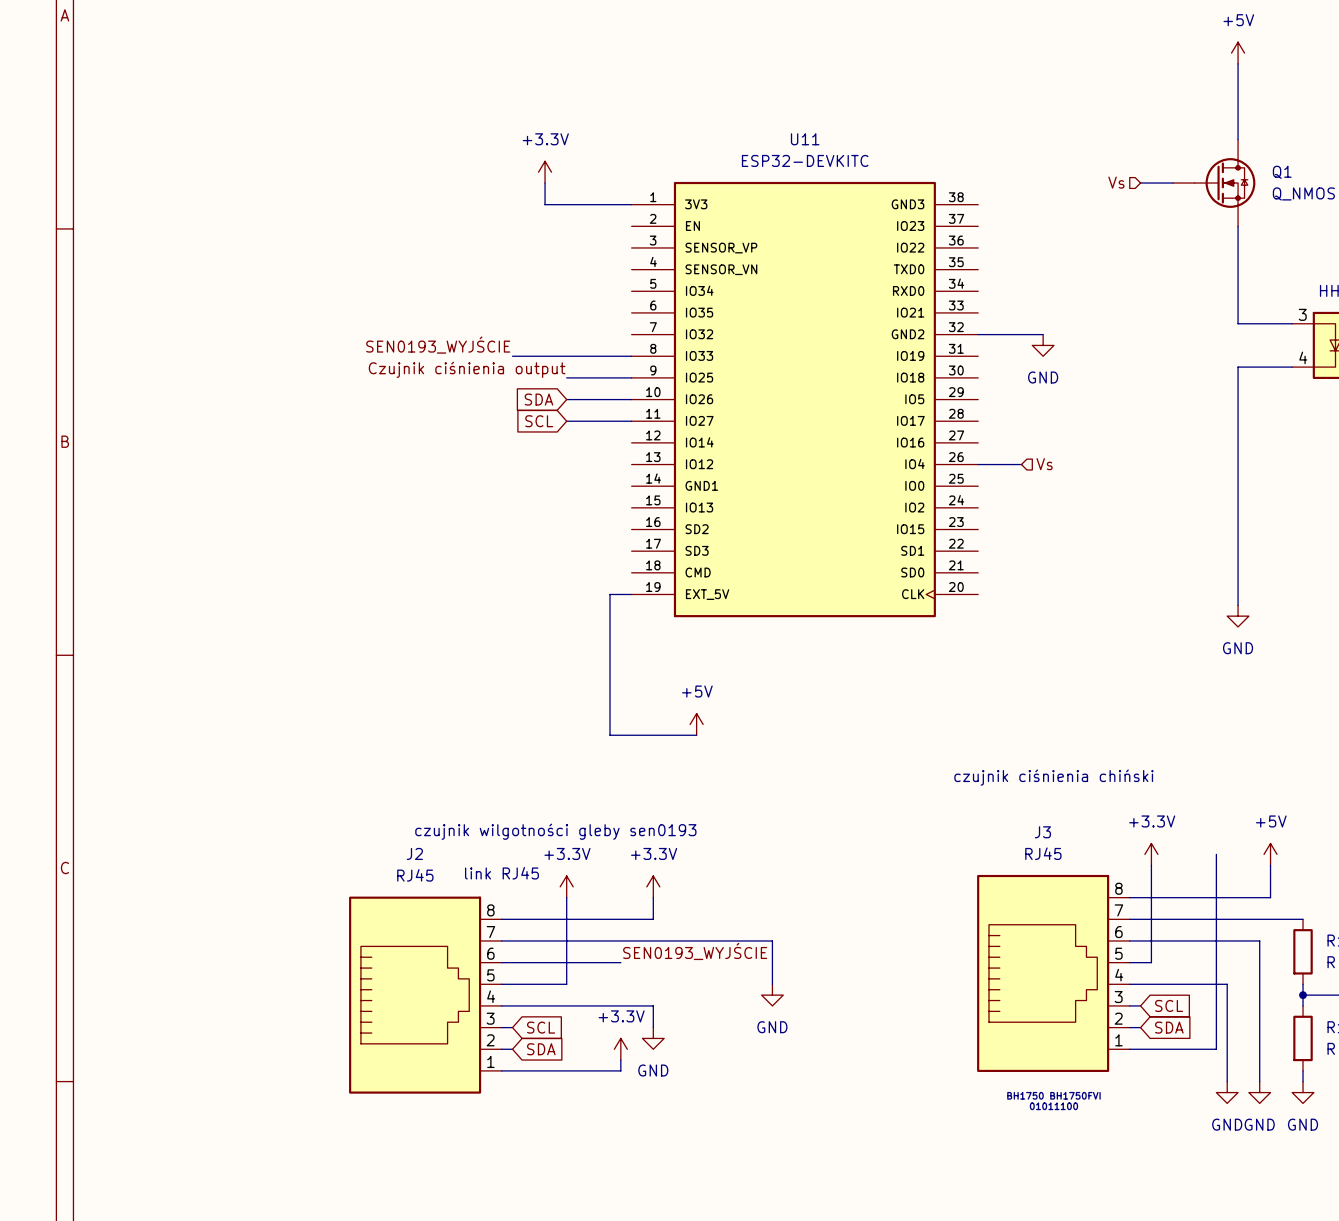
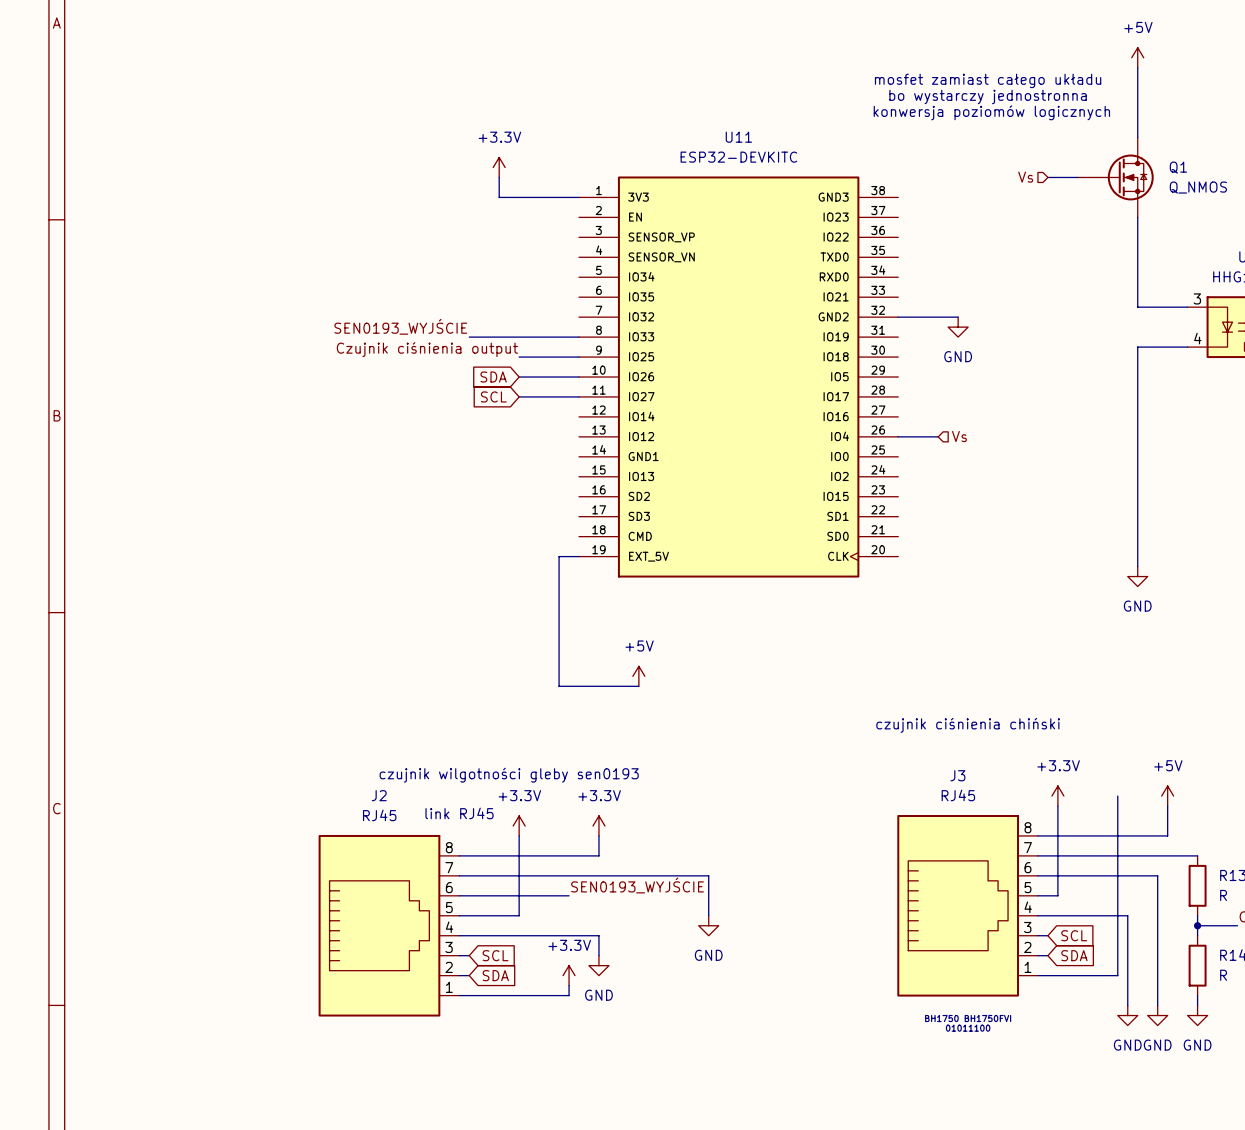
text: none -> mosfet zamiast całego układu (988, 80)
text: none -> bo wystarczy jednostronna (988, 96)
text: none -> konwersja poziomów logicznych (991, 112)

